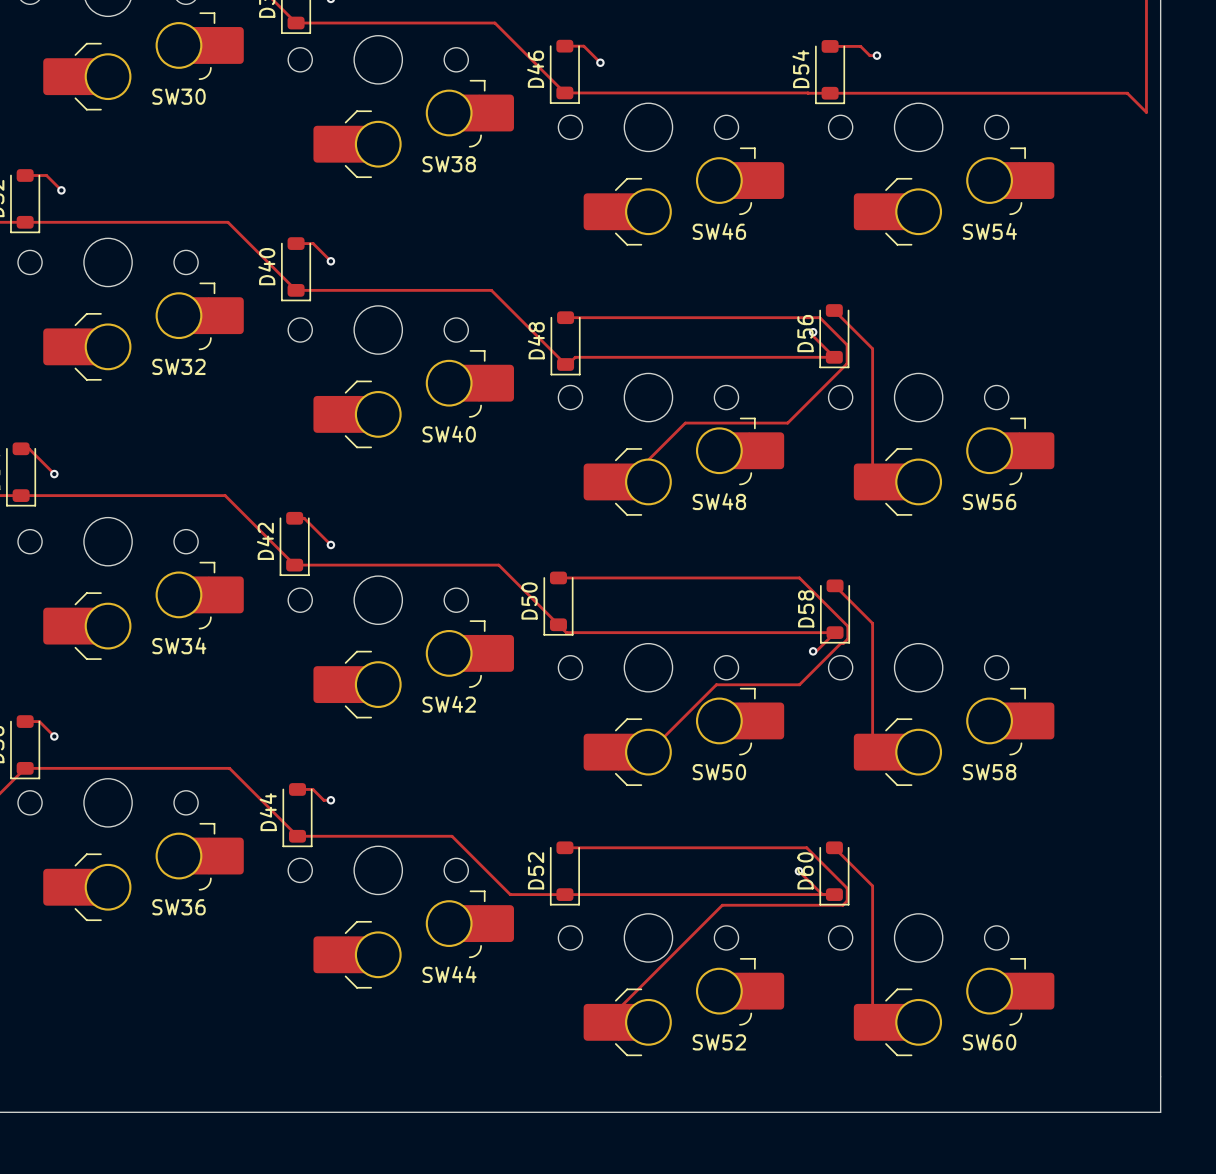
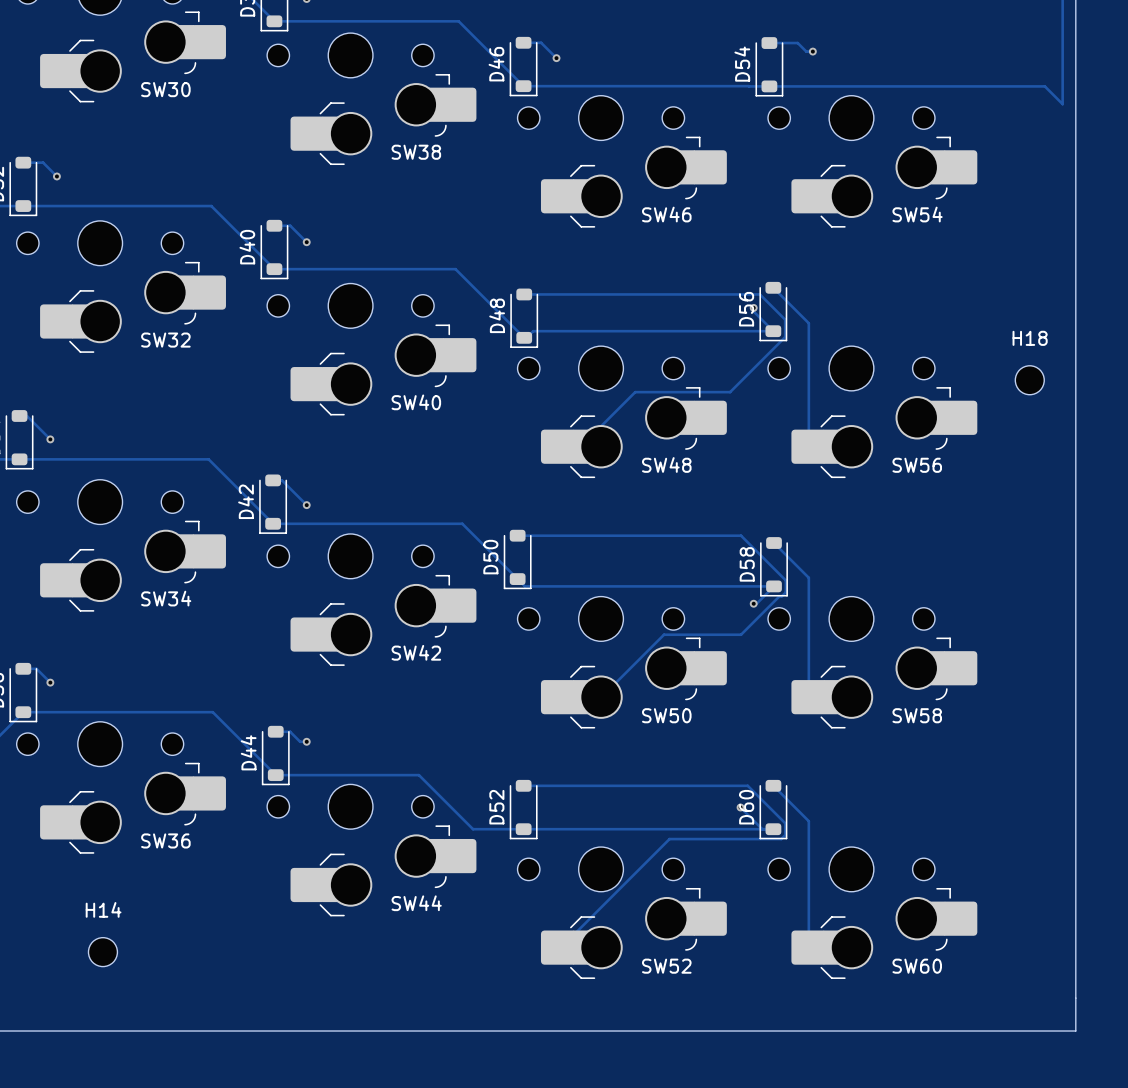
H18: none -> (1029, 380)
H14: none -> (102, 952)

